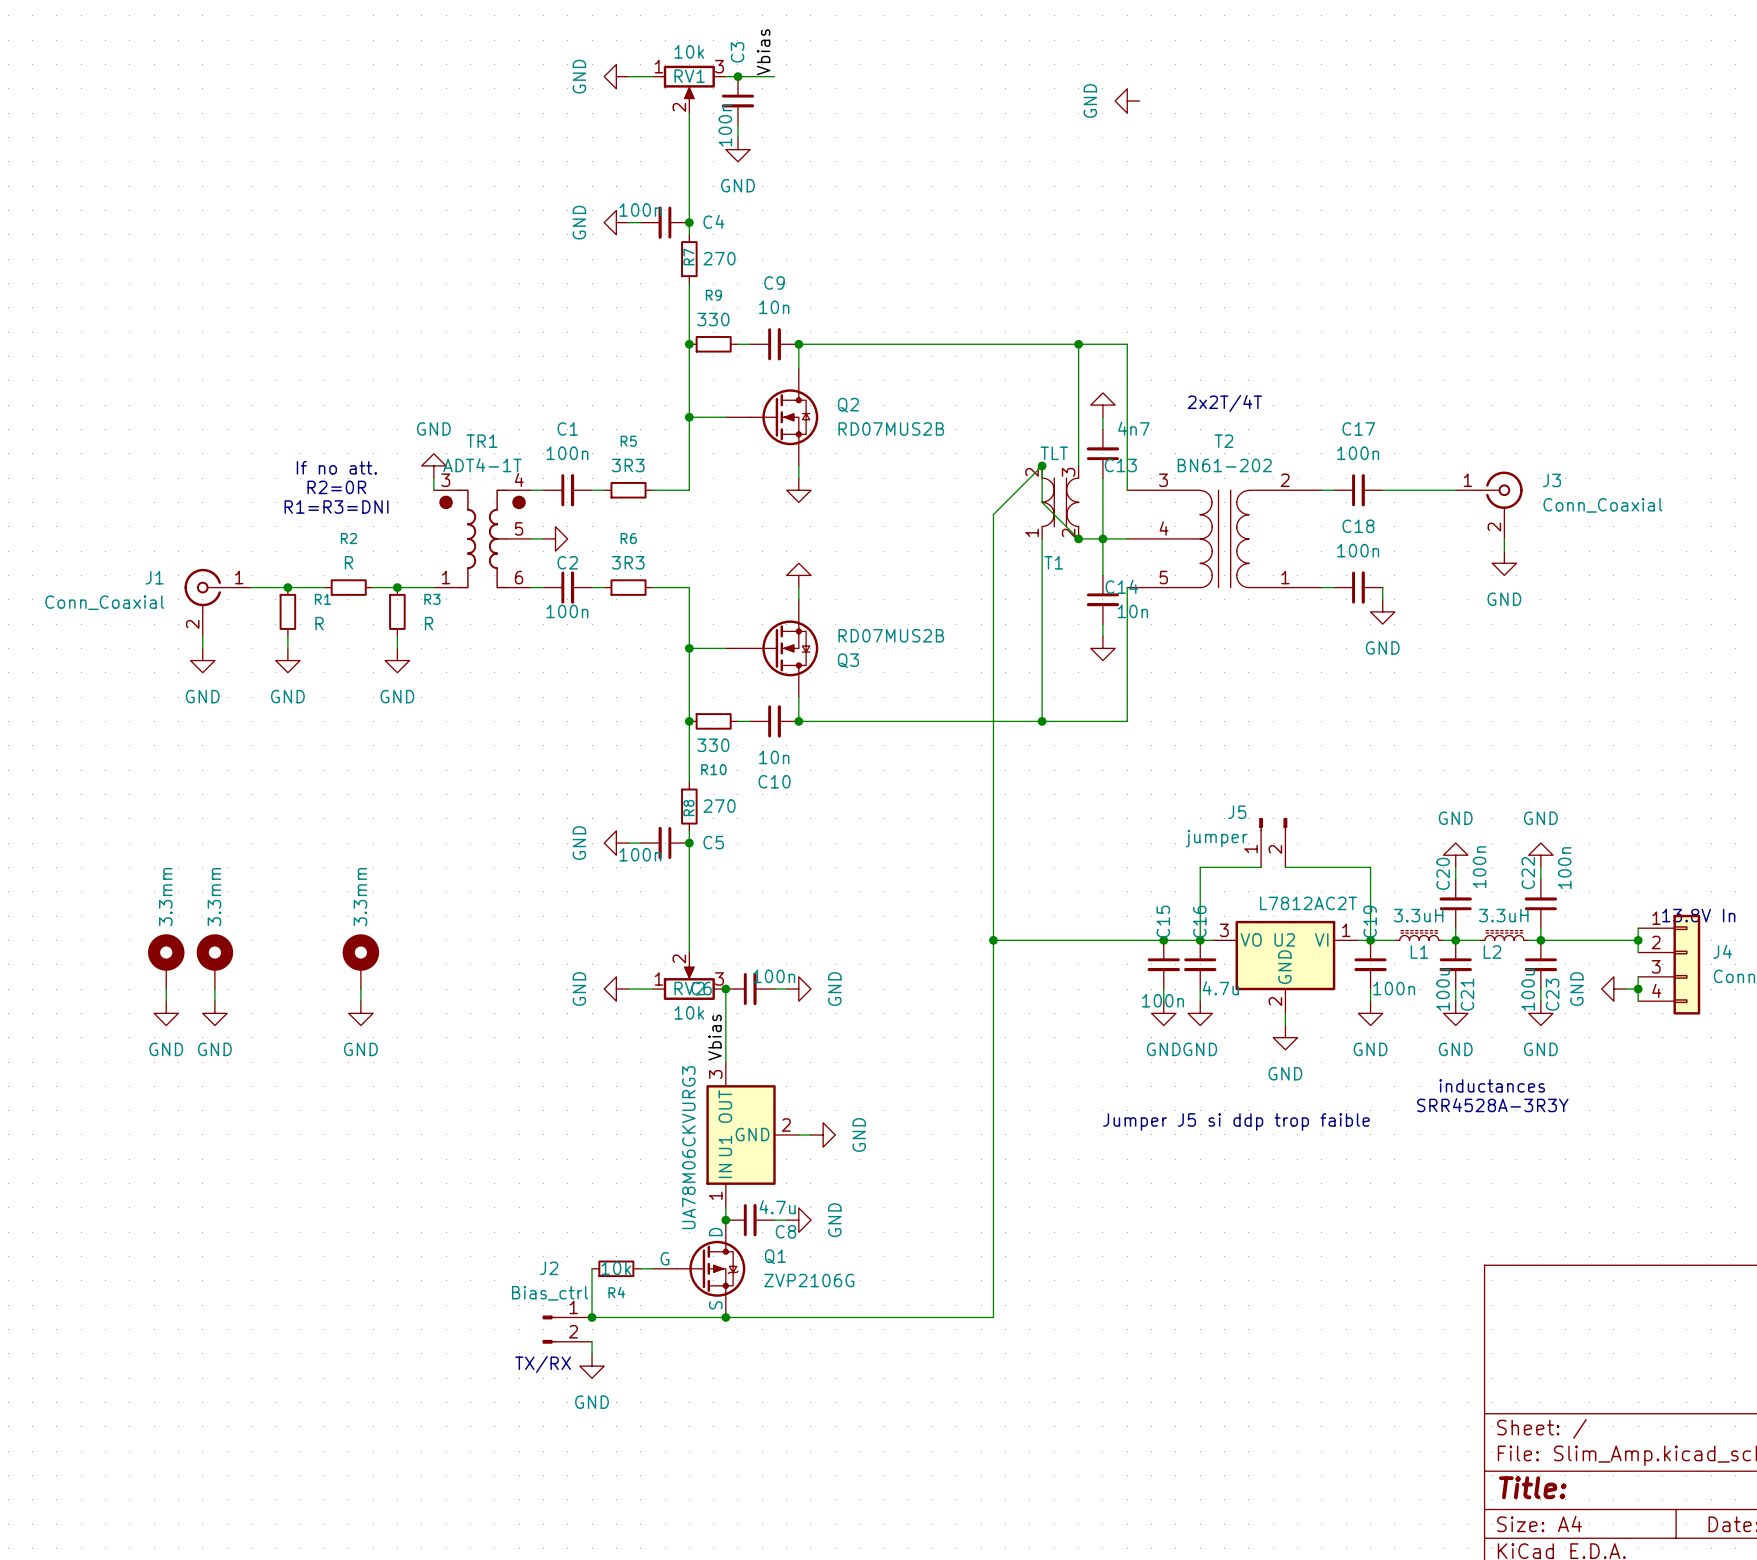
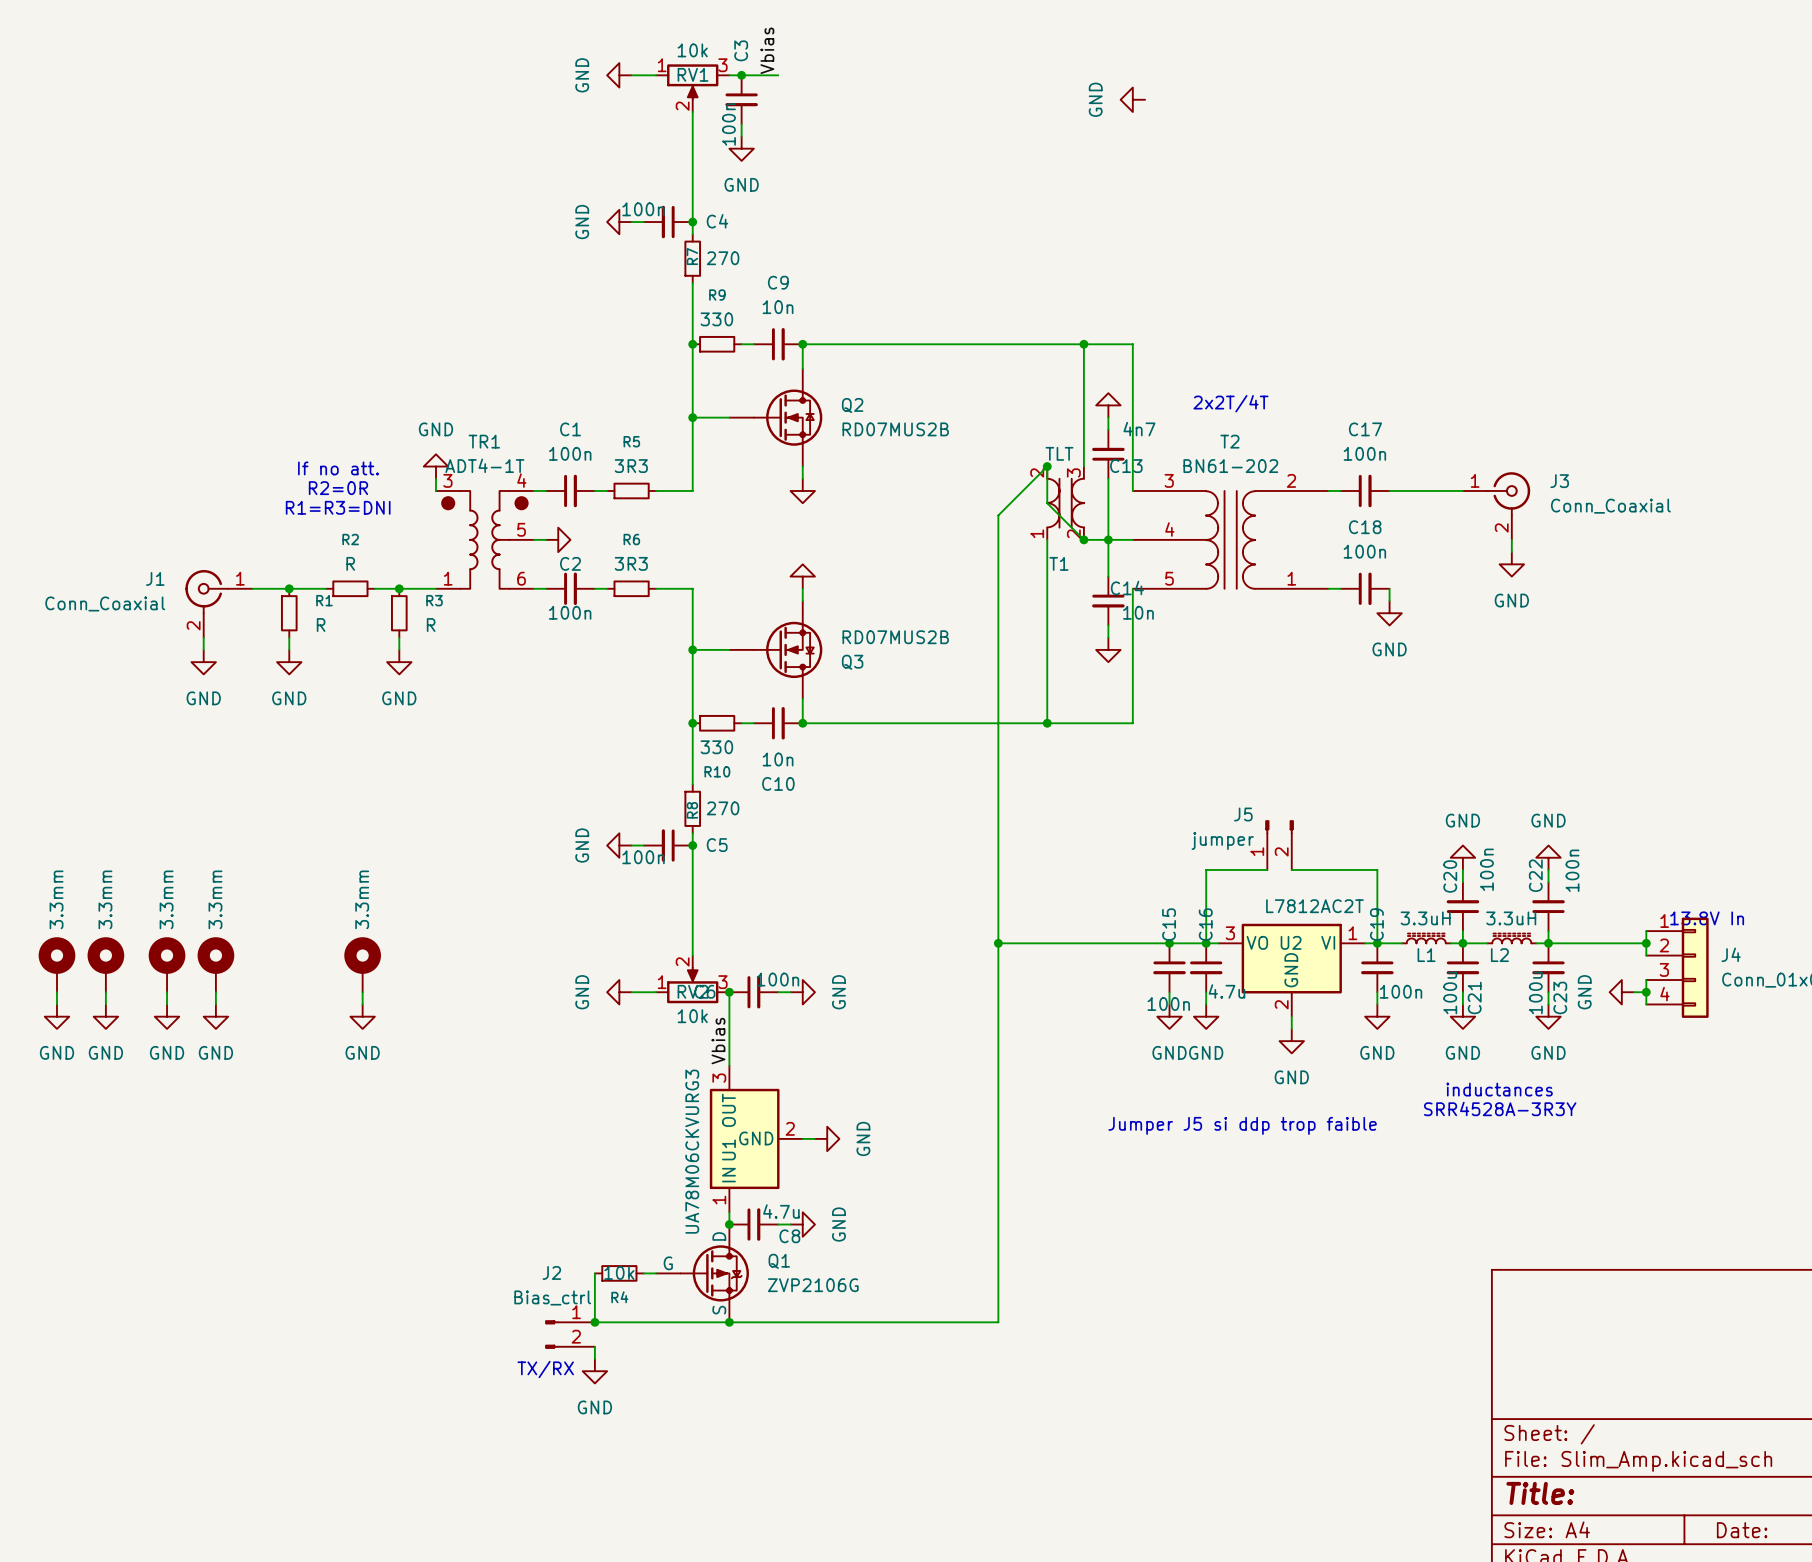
part: none -> 3.3mm (56, 964)
part: none -> 3.3mm (105, 964)
wire: none -> (56, 992) (56, 1004)
wire: none -> (105, 992) (105, 1004)
power symbol: none -> GND (56, 1016)
power symbol: none -> GND (105, 1016)

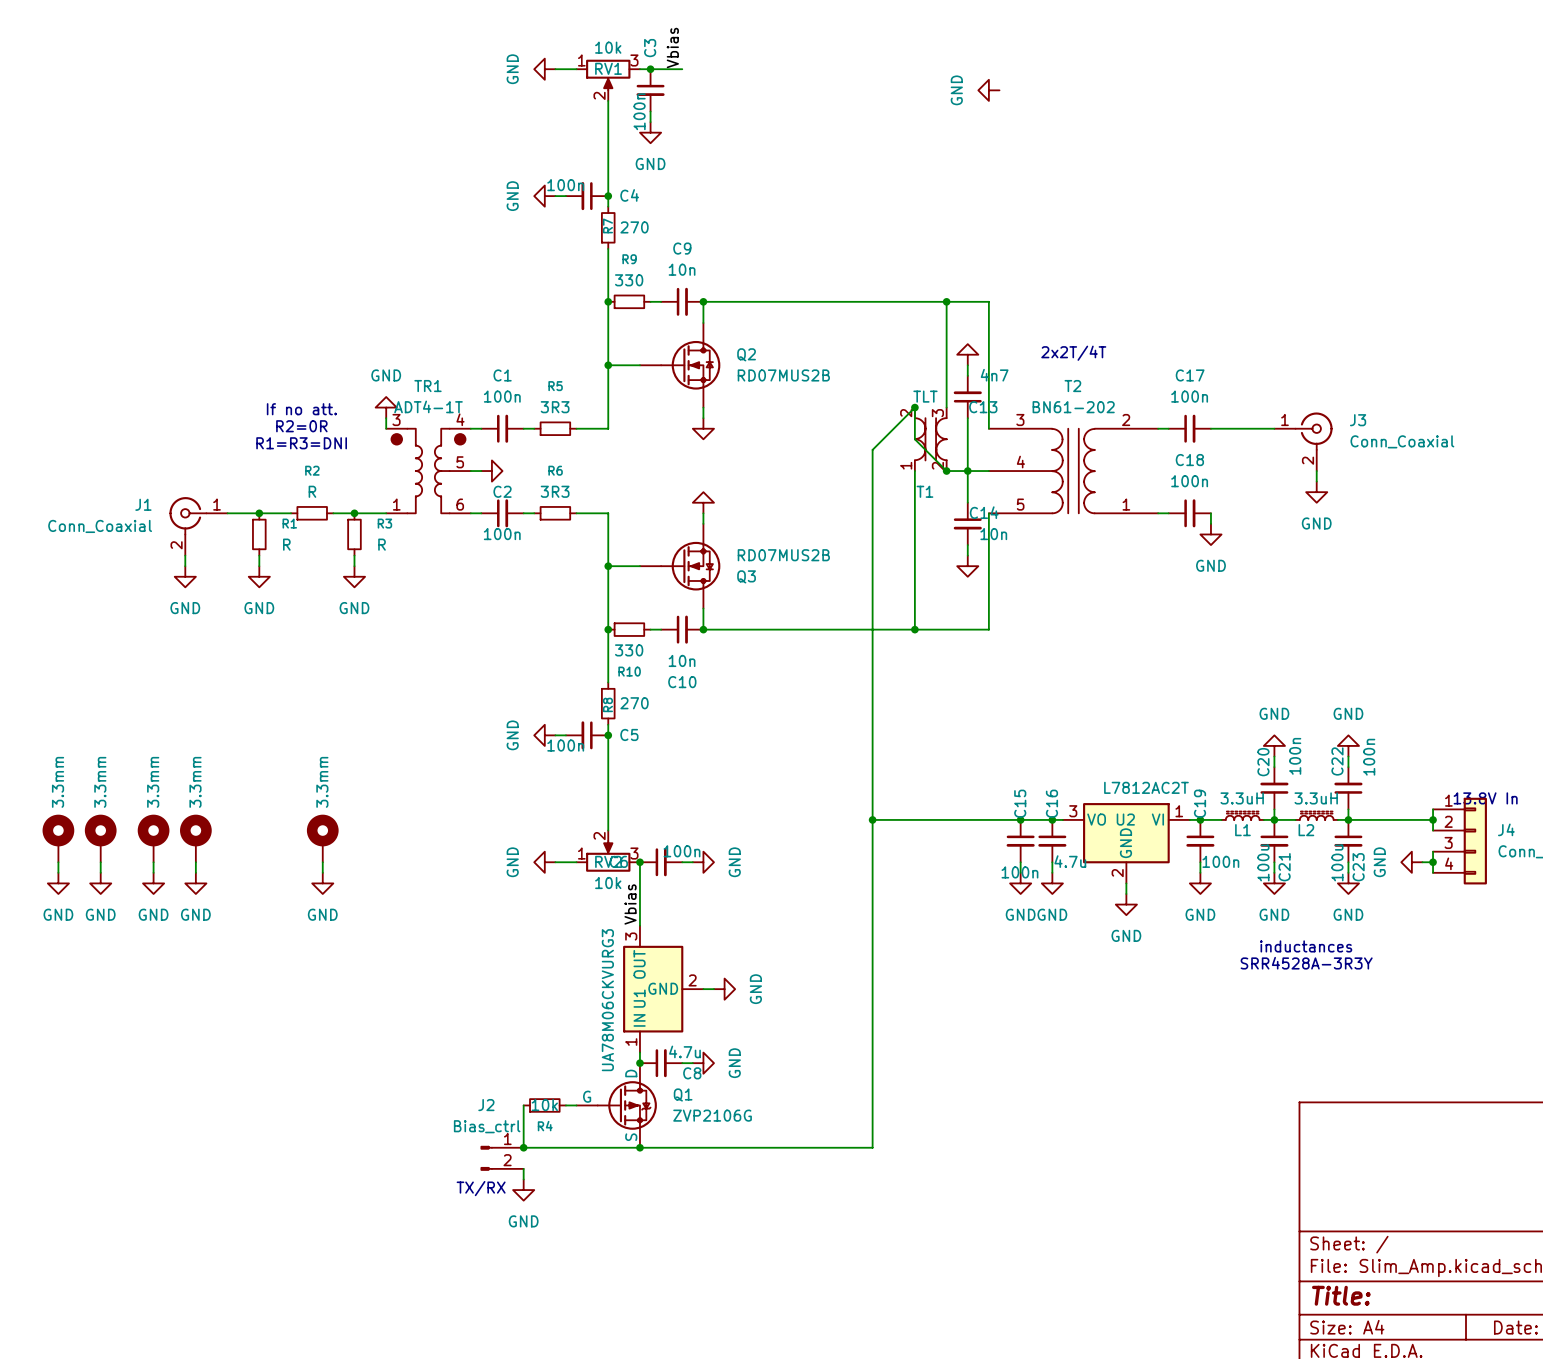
J5: jumper (1279, 845) -> none
wire: (1267, 869) (1206, 869) (1206, 943) -> none
wire: (1291, 869) (1377, 869) (1377, 943) -> none
text: Jumper J5 si ddp trop faible (1242, 1125) -> none

